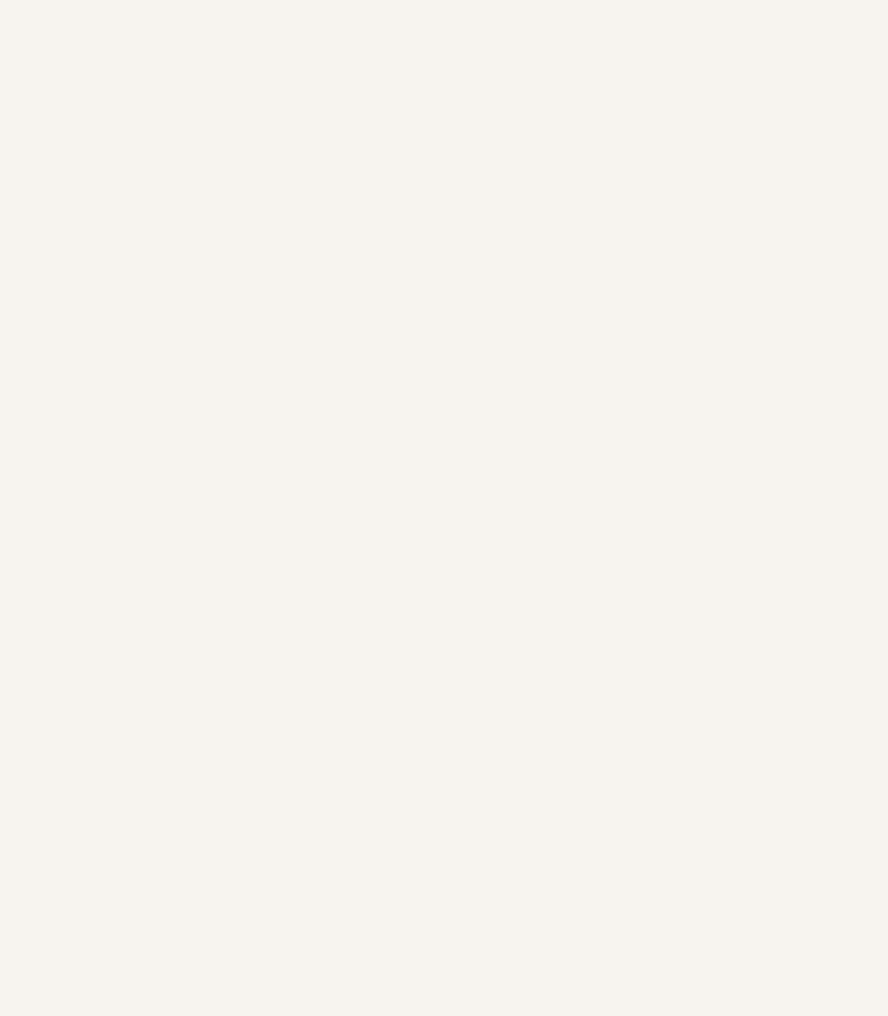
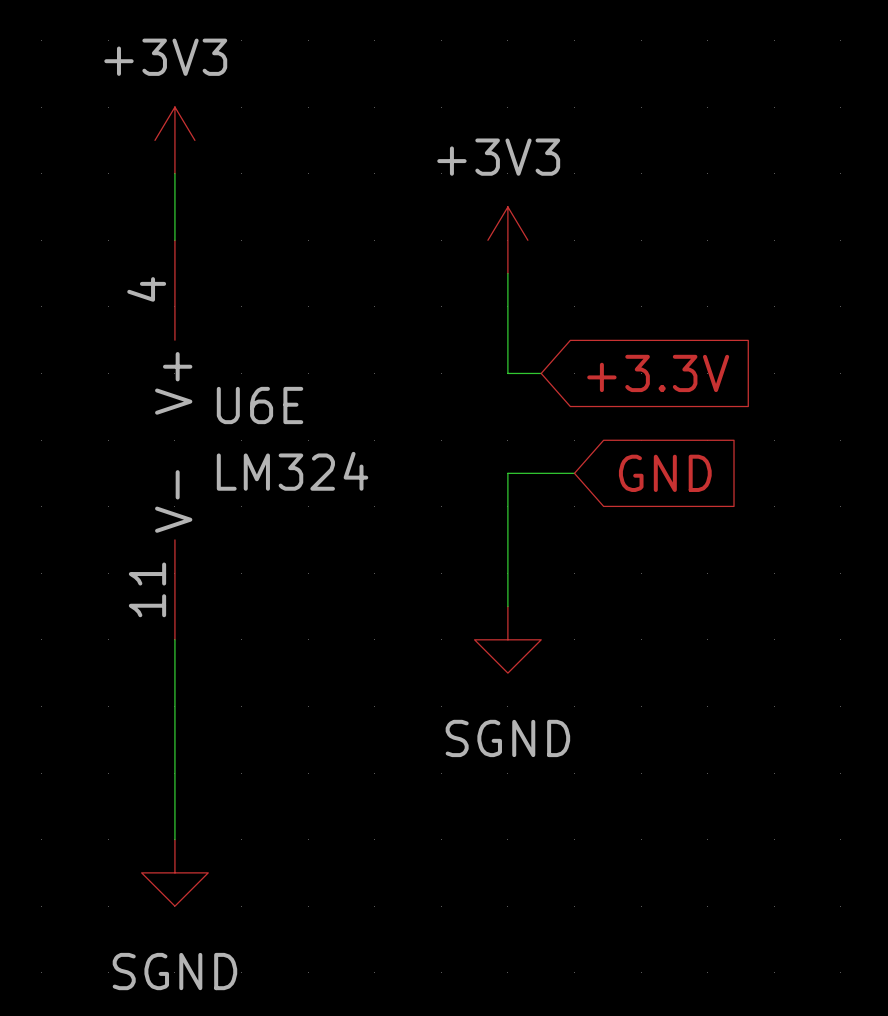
power symbol: none -> +3V3 (174, 140)
wire: none -> (174, 173) (174, 240)
power symbol: none -> +3V3 (507, 240)
wire: none -> (507, 273) (507, 373) (541, 373)
global label: none -> +3.3V (658, 373)
U6E: none -> LM324 (174, 440)
wire: none -> (574, 473) (507, 473) (507, 606)
global label: none -> GND (665, 473)
wire: none -> (174, 639) (174, 839)
power symbol: none -> SGND (507, 639)
power symbol: none -> SGND (174, 872)

